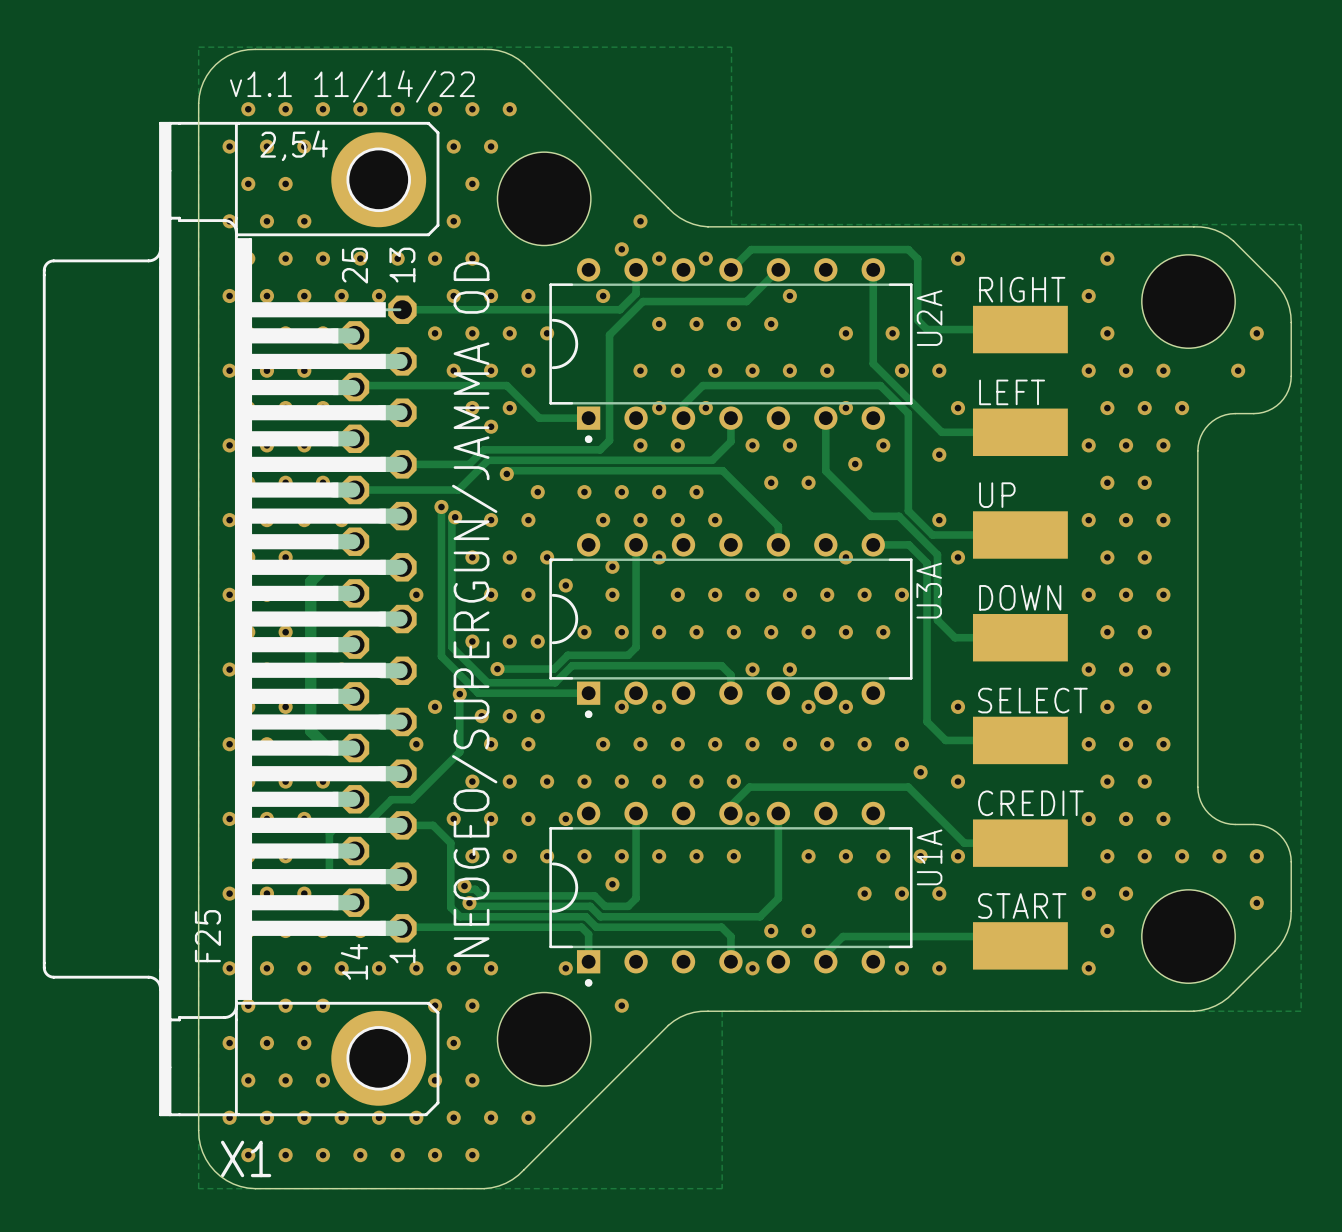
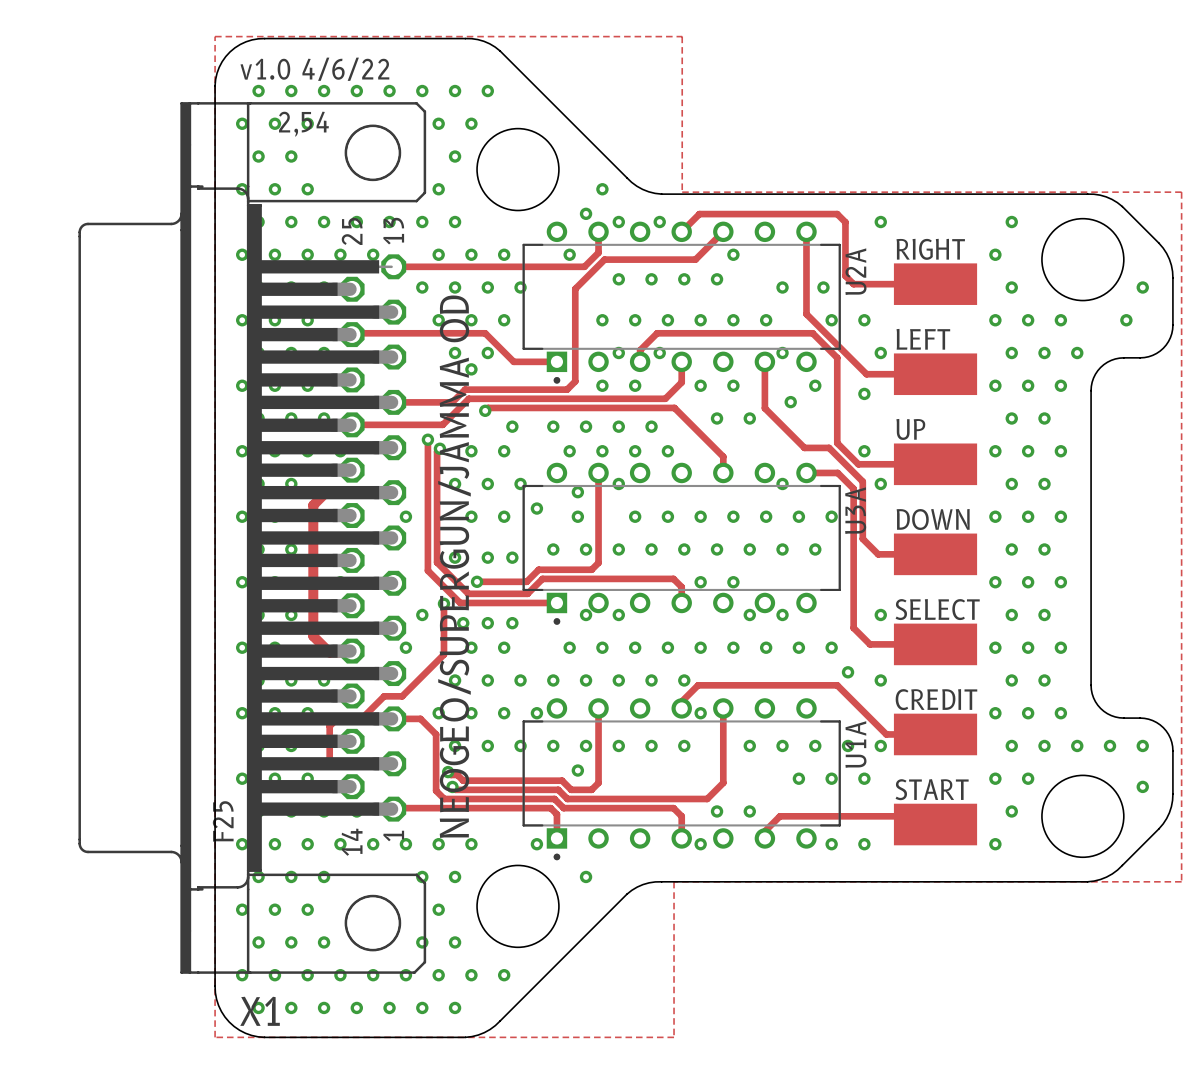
text: v1.1 11/14/22 (352, 86) -> v1.0 4/6/22 (314, 69)
X1 footprint: [42, 121, 440, 1117] -> [78, 102, 427, 974]
U2A footprint: [549, 258, 913, 443] -> [522, 221, 841, 384]
U3A footprint: [549, 533, 913, 719] -> [522, 462, 841, 625]
U1A footprint: [549, 801, 913, 987] -> [522, 698, 841, 861]

